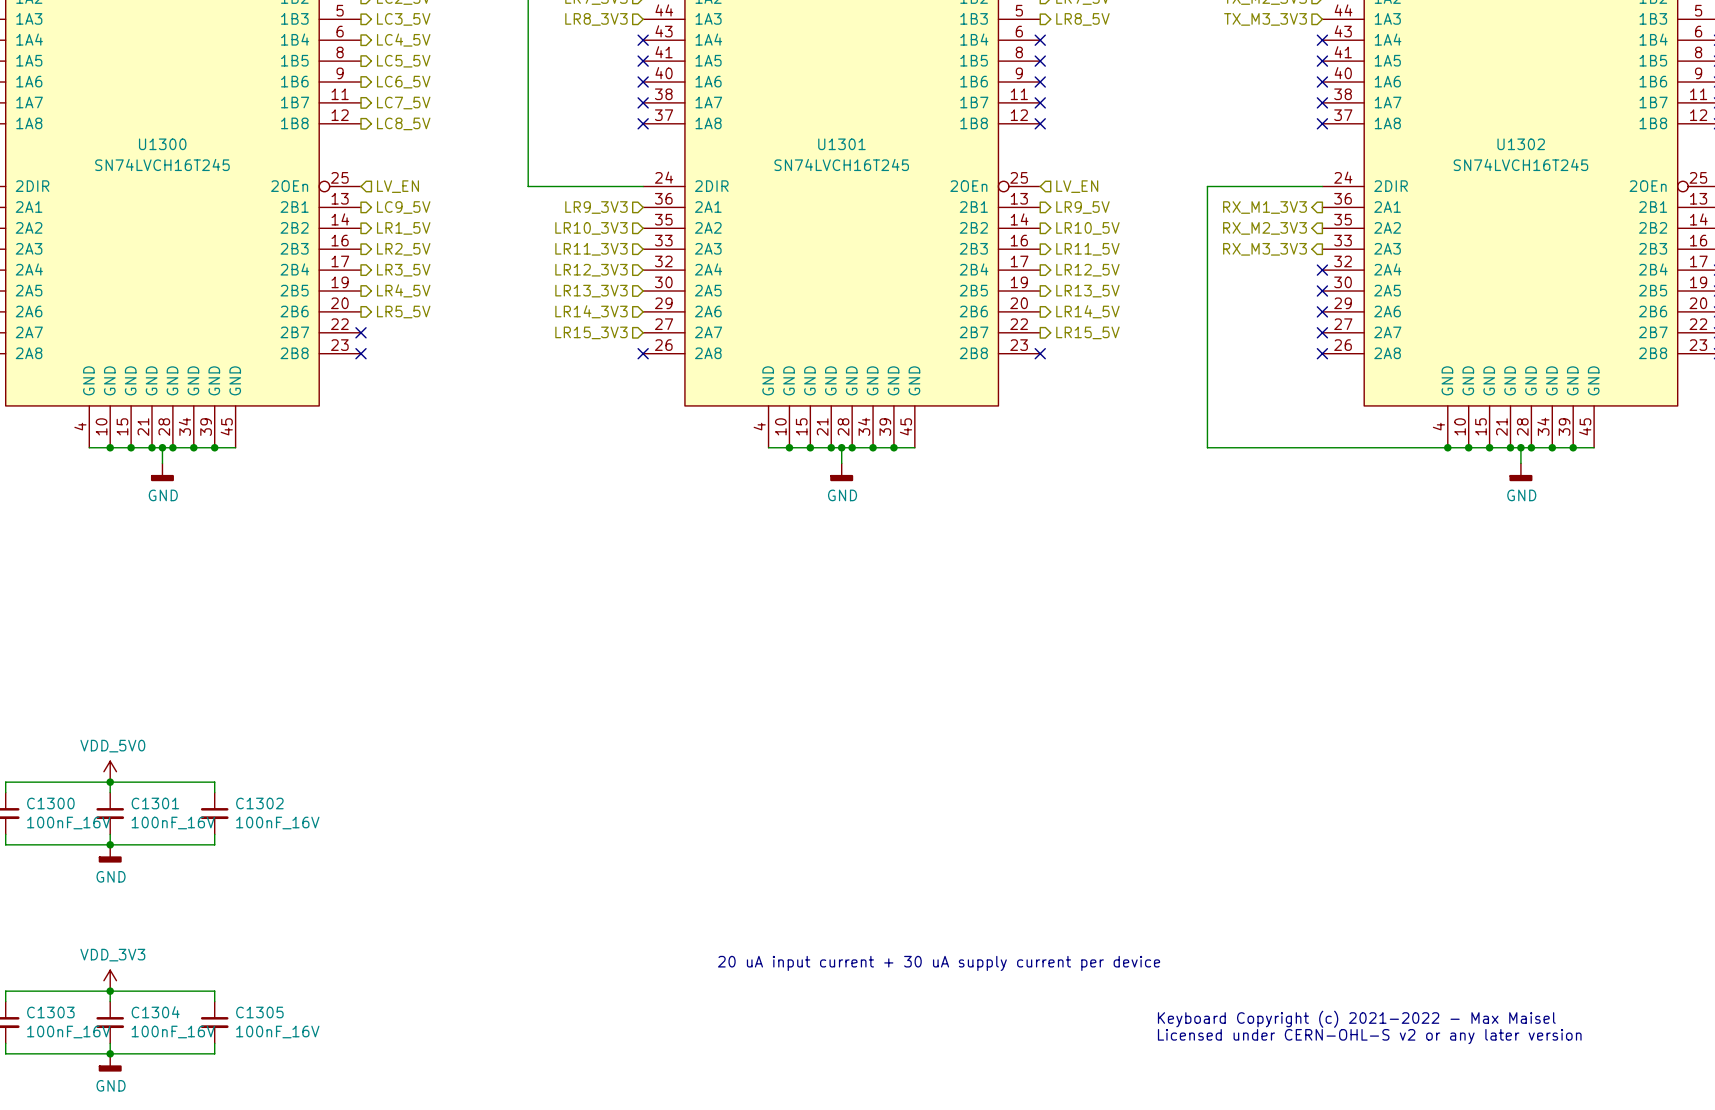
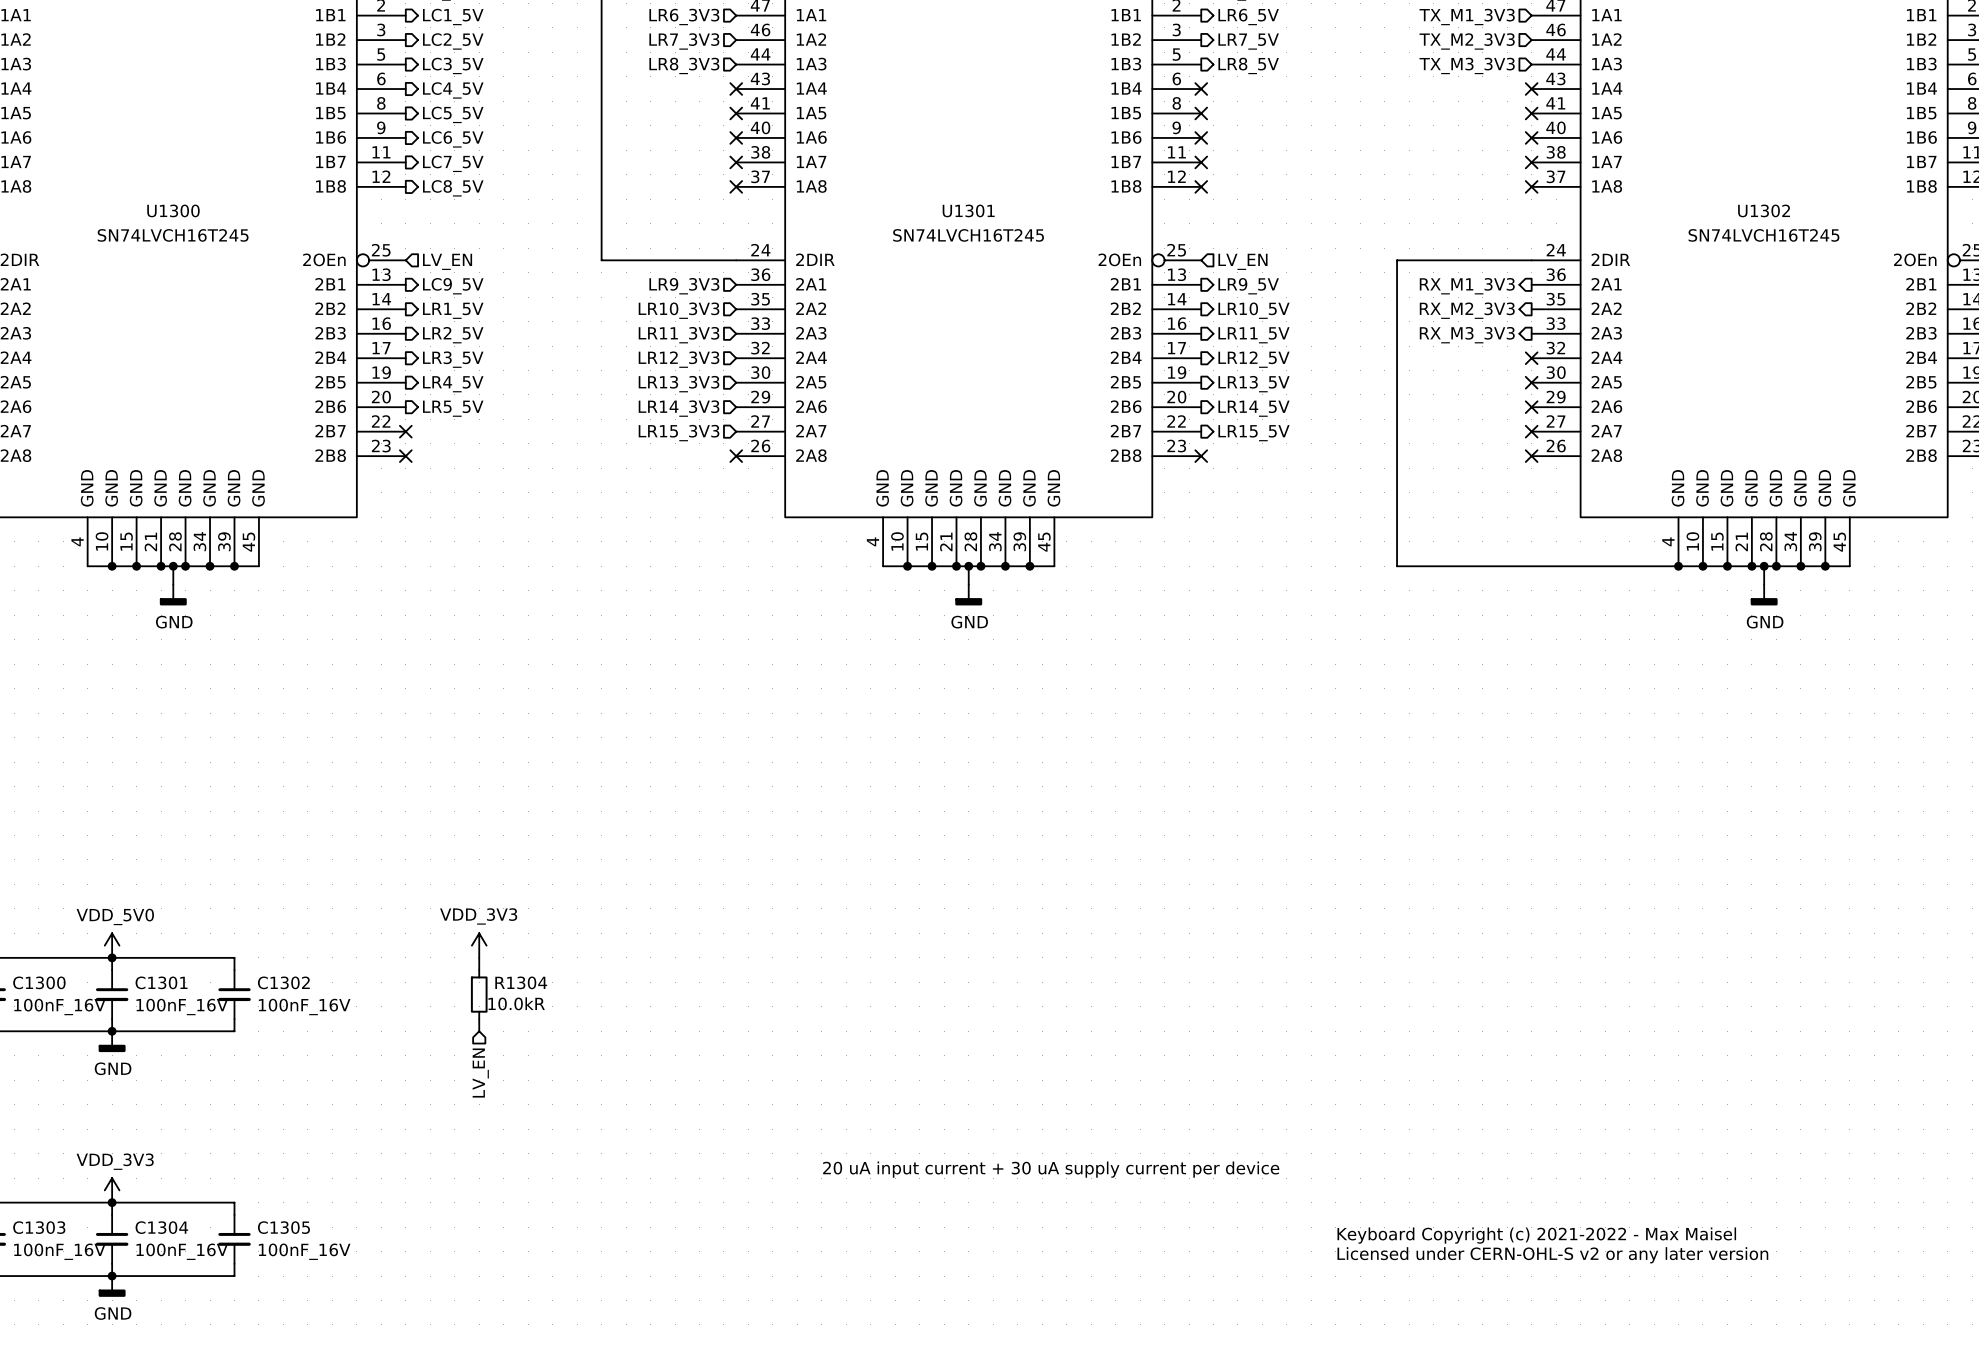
power symbol: none -> VDD_3V3 (479, 945)
wire: none -> (479, 957) (479, 970)
R1304: none -> 10.0kR (479, 994)
wire: none -> (479, 1019) (479, 1031)
hierarchical label: none -> LV_EN (480, 1073)

